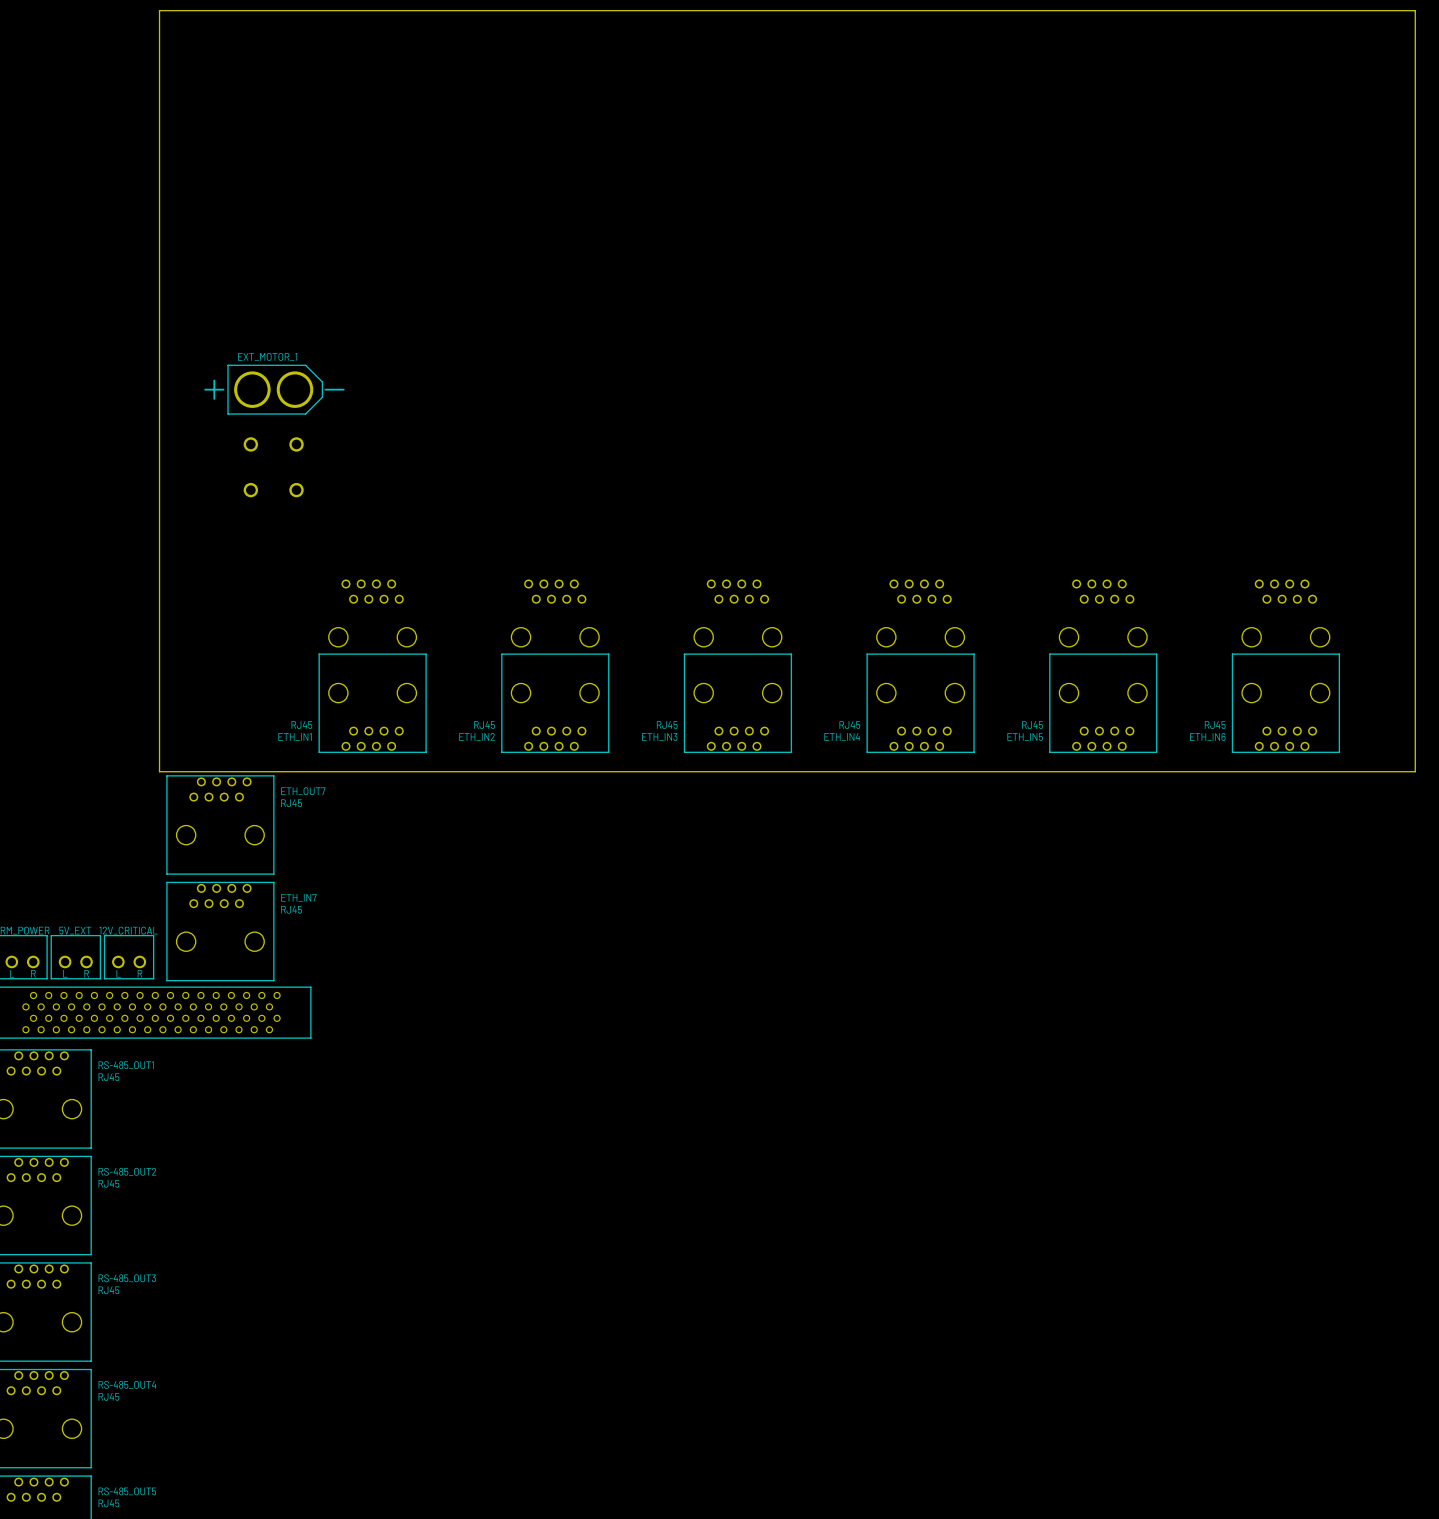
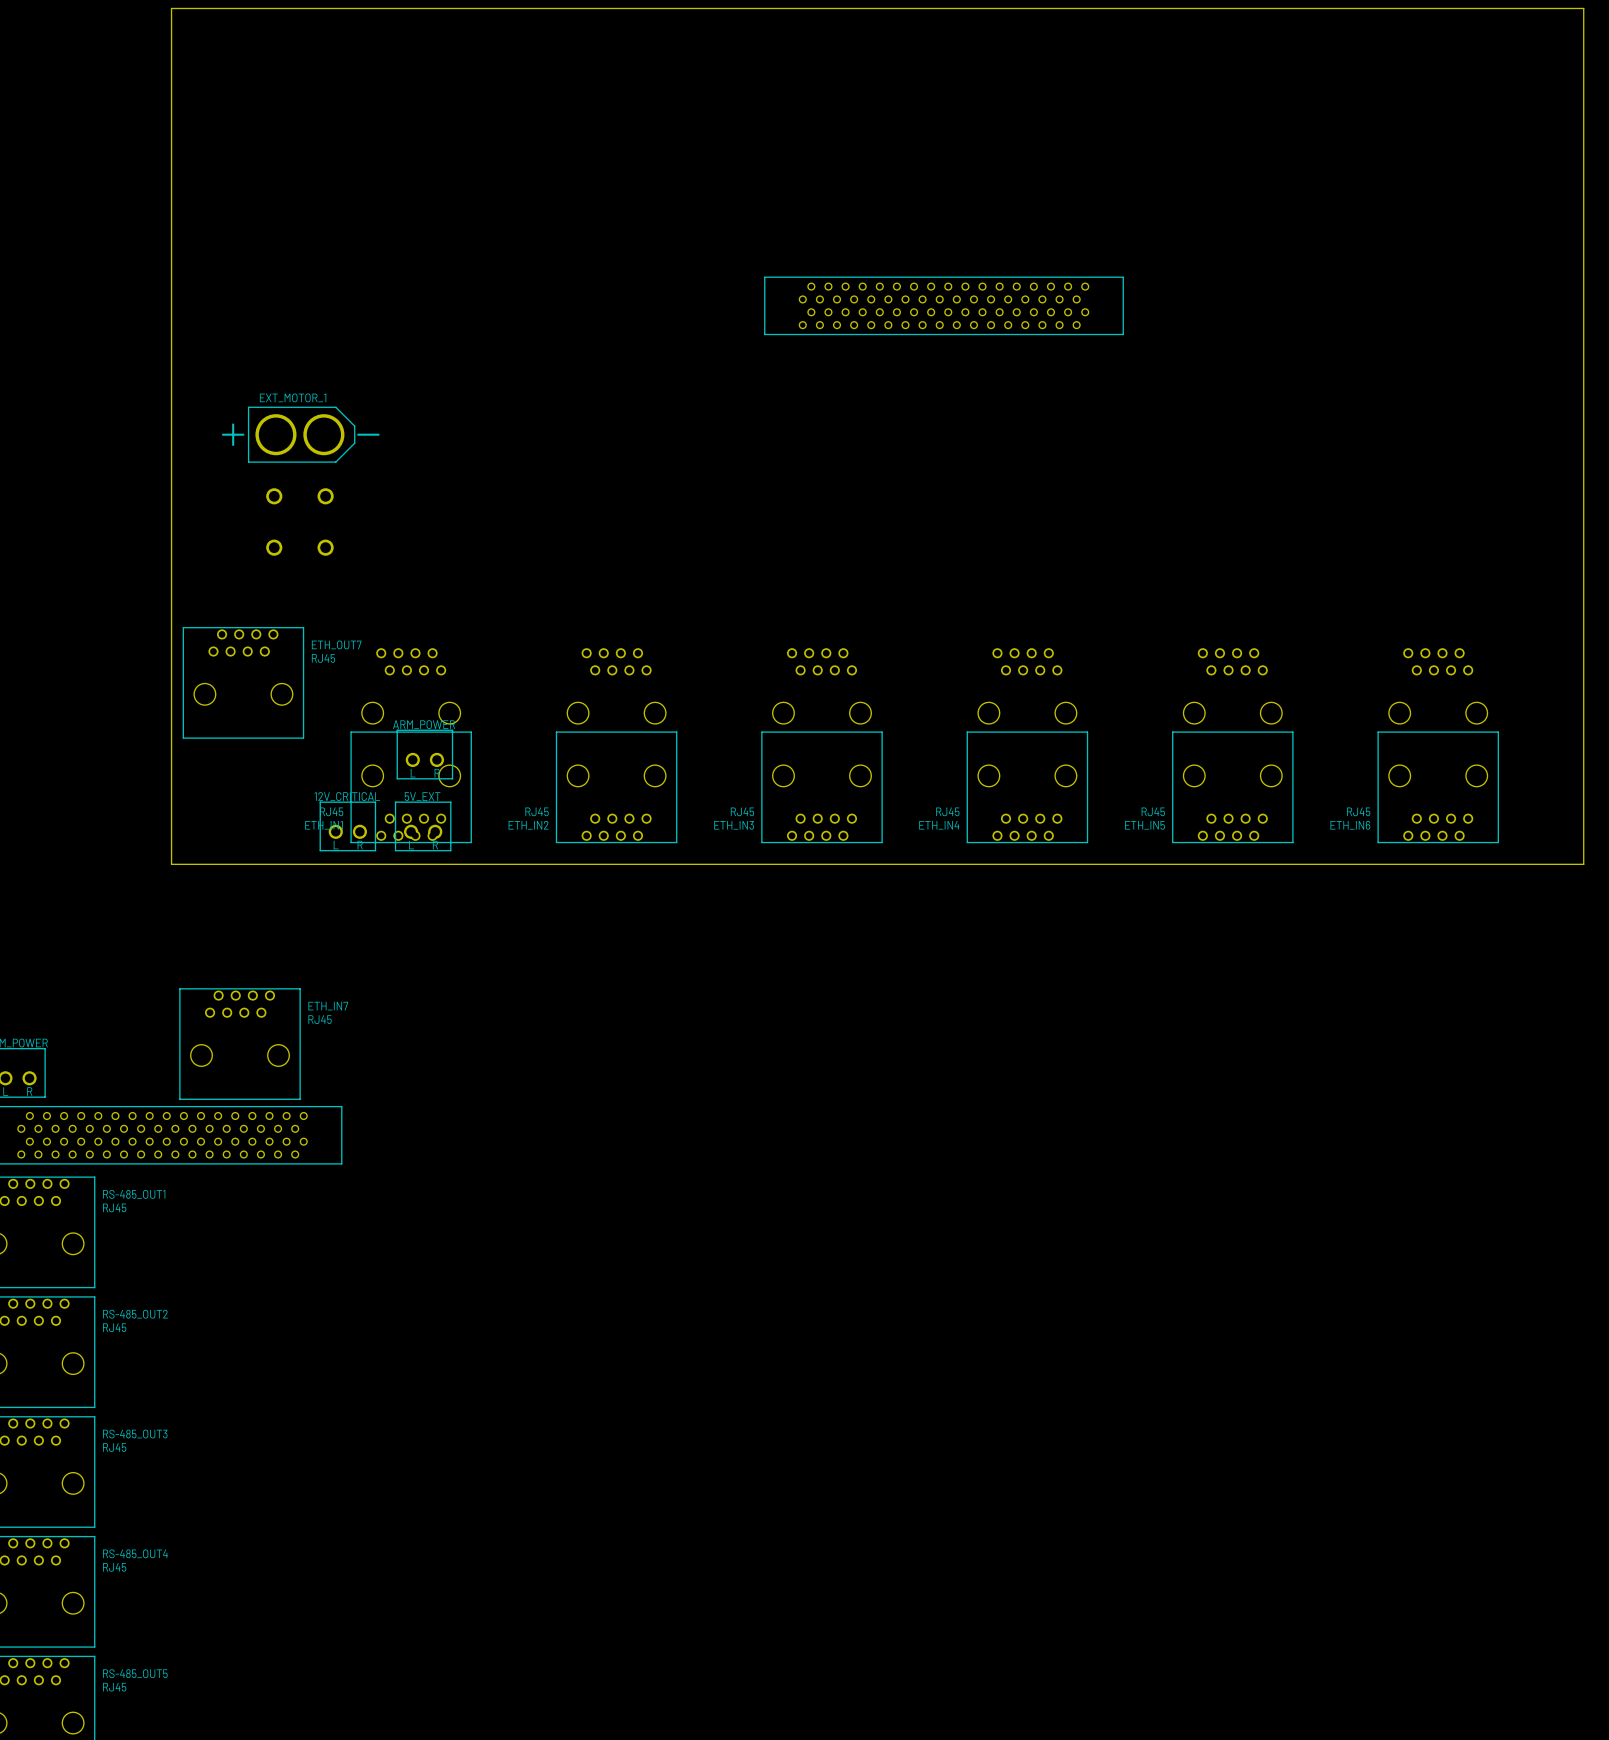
part: none -> (944, 305)
ARM_POWER: none -> (424, 754)
ETH_OUT7 position: (220, 824) -> (243, 682)
5V_EXT position: (75, 957) -> (423, 826)
12V_CRITICAL position: (129, 957) -> (347, 826)

